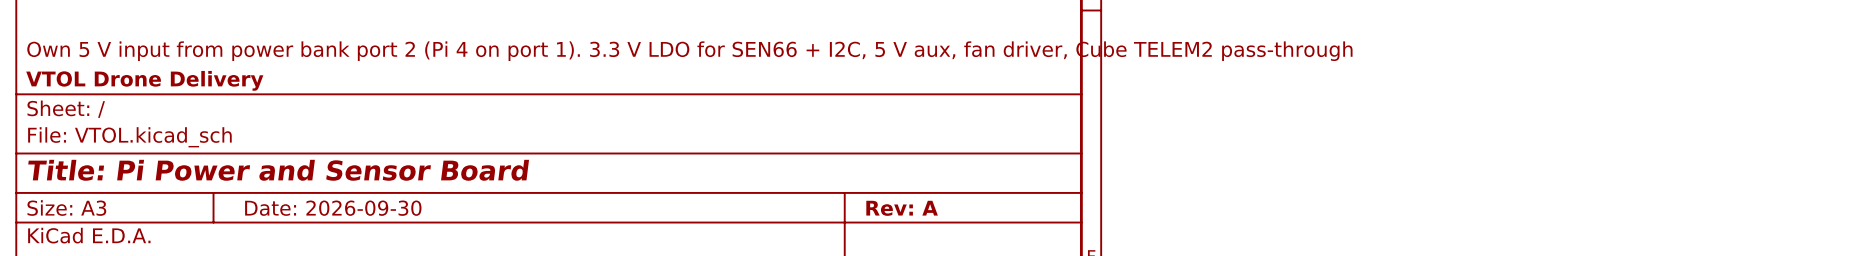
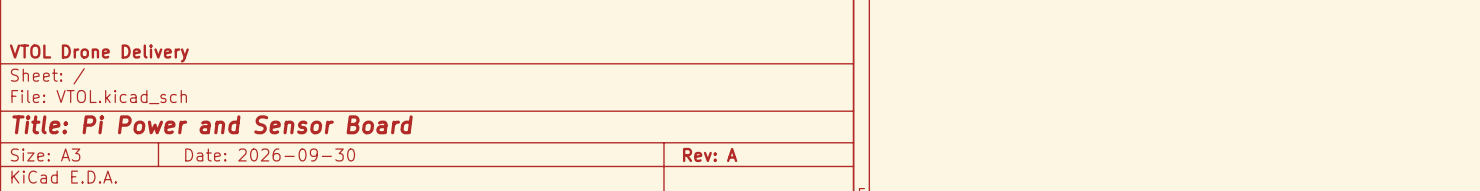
title block: Own 5 V input from power bank port 2 (Pi 4 on port 1). 3.3 V LDO for SEN66 + I2C, 5 V aux, fan driver, Cube TELEM2 pass-through (689, 51) -> none

